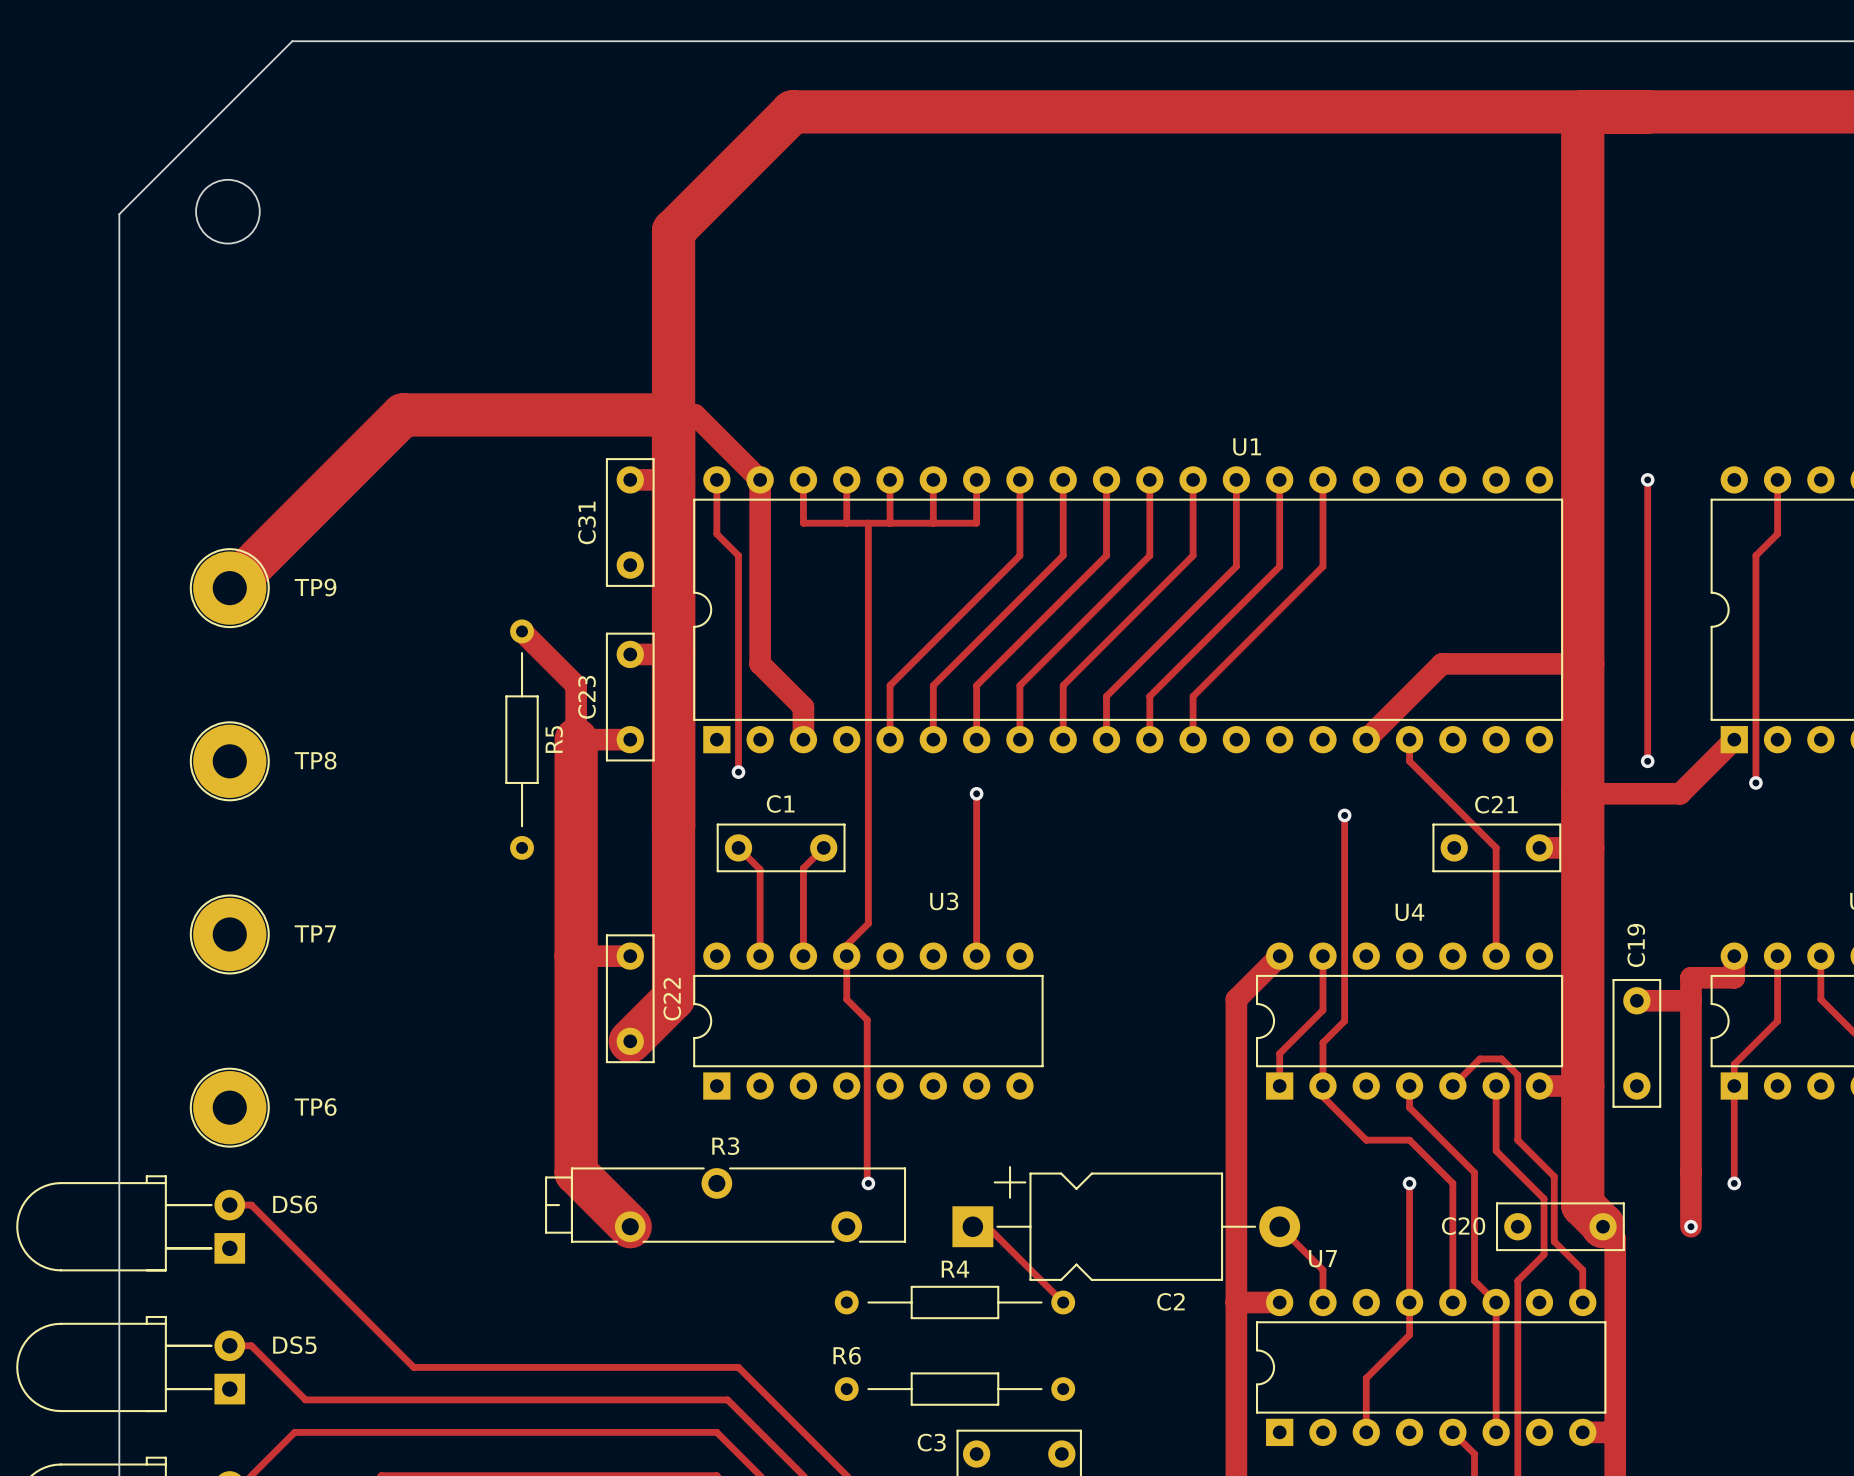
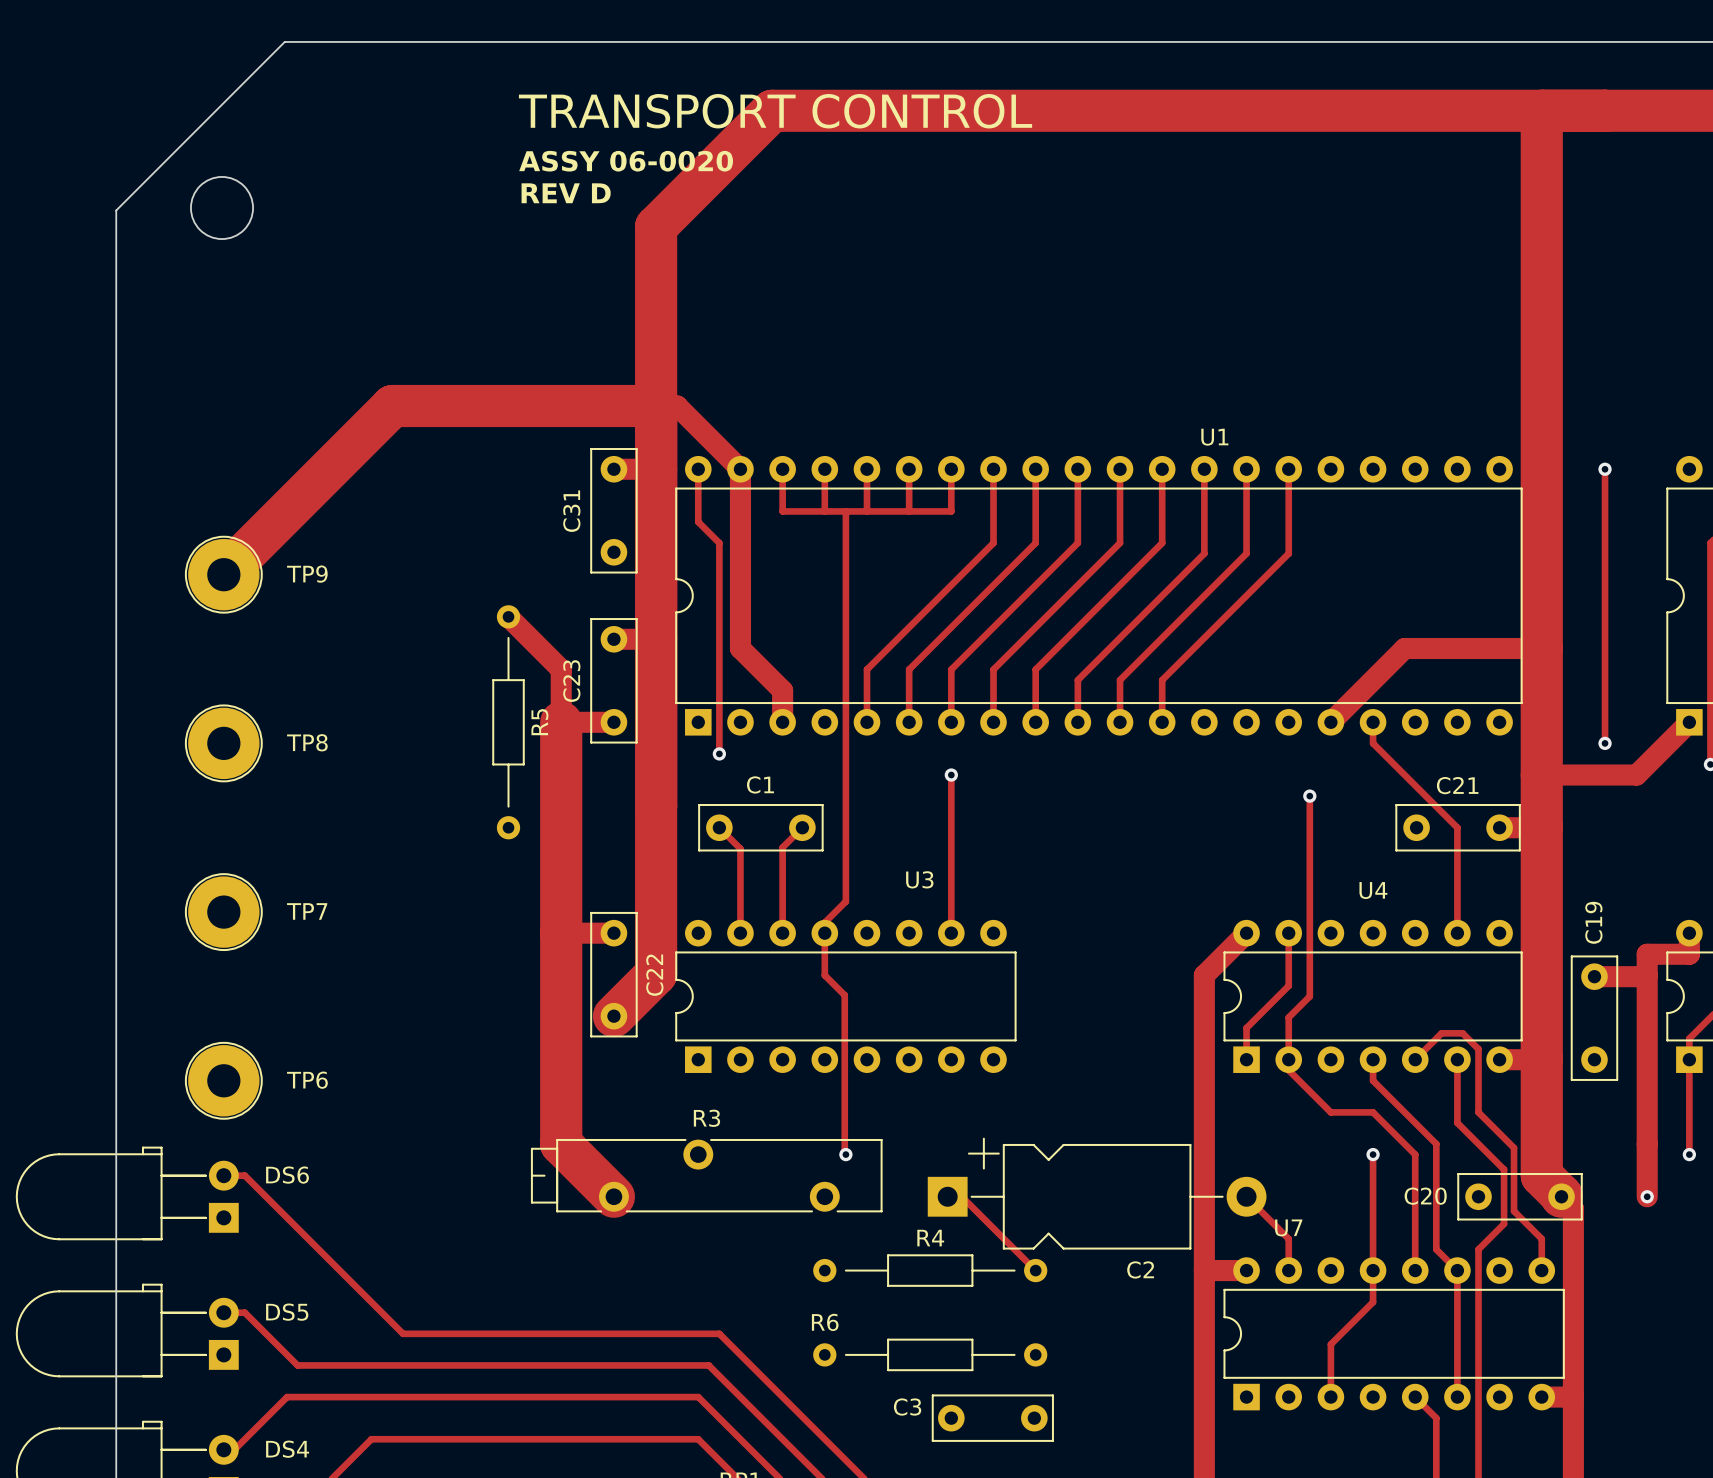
text: none -> TRANSPORT CONTROL (775, 111)
text: none -> ASSY 06-0020 (626, 161)
text: none -> REV D (566, 193)

